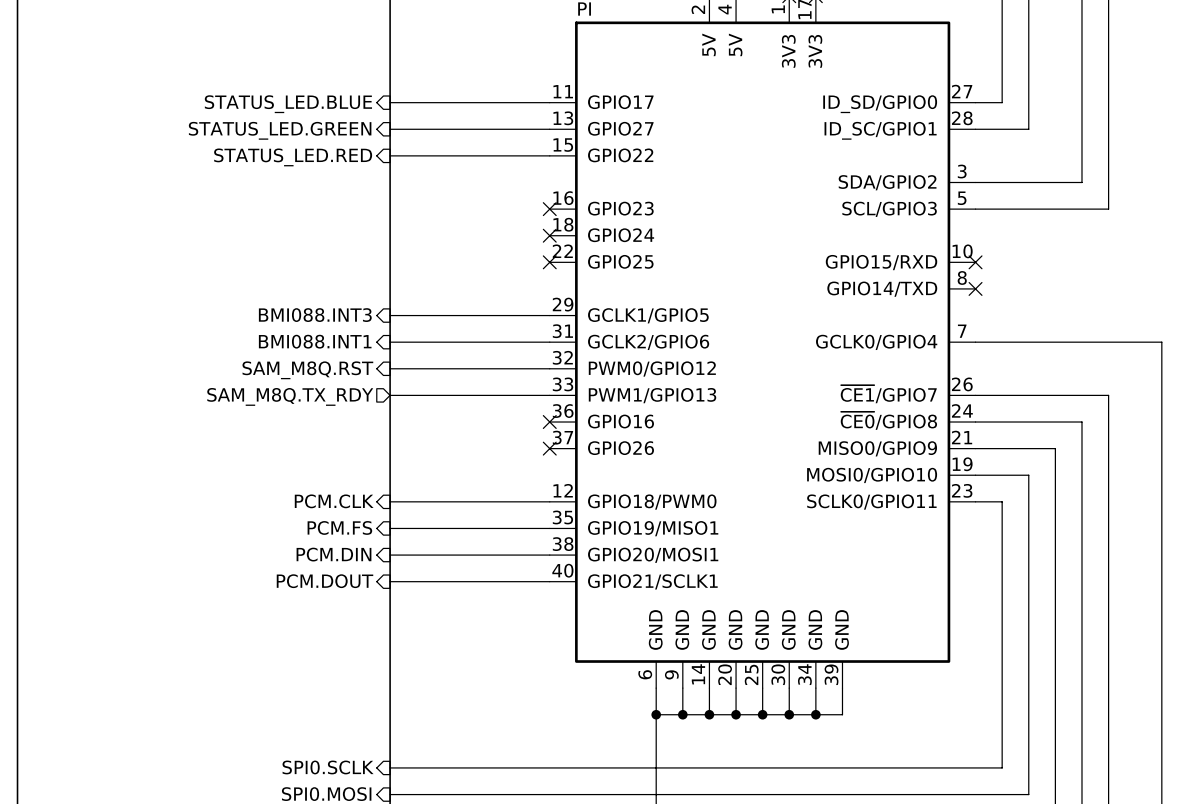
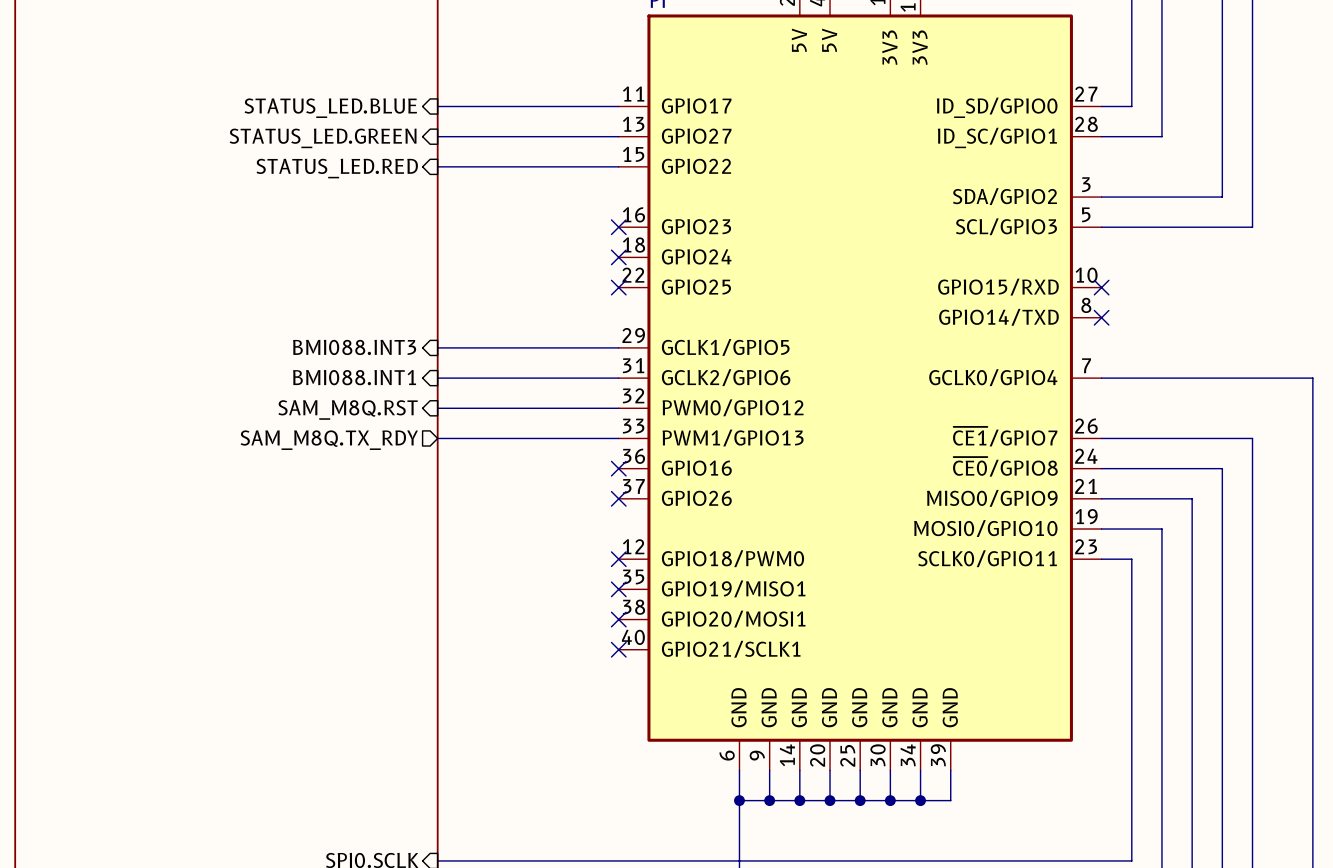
sheet pin: PCM.CLK (334, 501) -> none
wire: (390, 501) (549, 501) -> none
no-connect mark: none -> (618, 559)
sheet pin: PCM.FS (339, 527) -> none
wire: (390, 528) (549, 528) -> none
no-connect mark: none -> (618, 589)
sheet pin: PCM.DIN (333, 554) -> none
wire: (390, 555) (549, 555) -> none
no-connect mark: none -> (618, 619)
sheet pin: PCM.DOUT (325, 581) -> none
wire: (390, 581) (549, 581) -> none
no-connect mark: none -> (618, 649)

